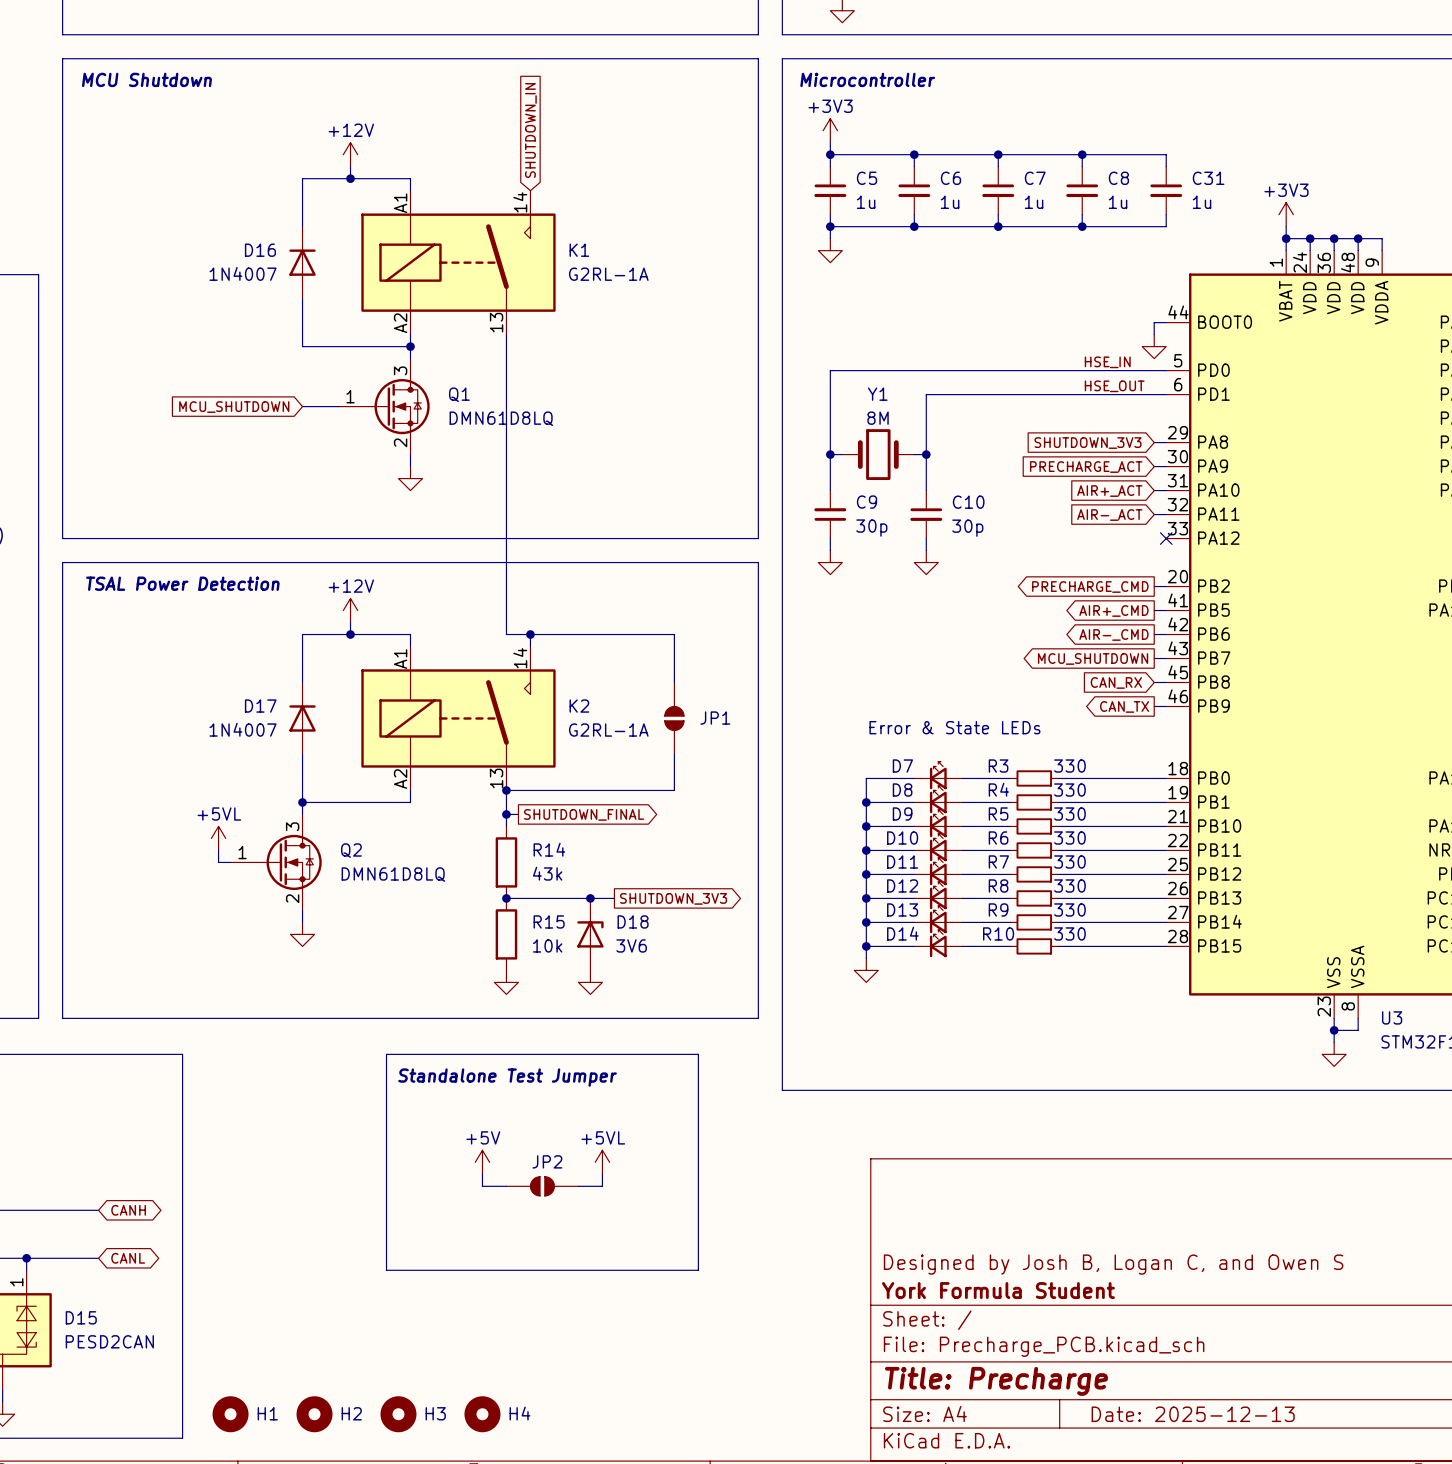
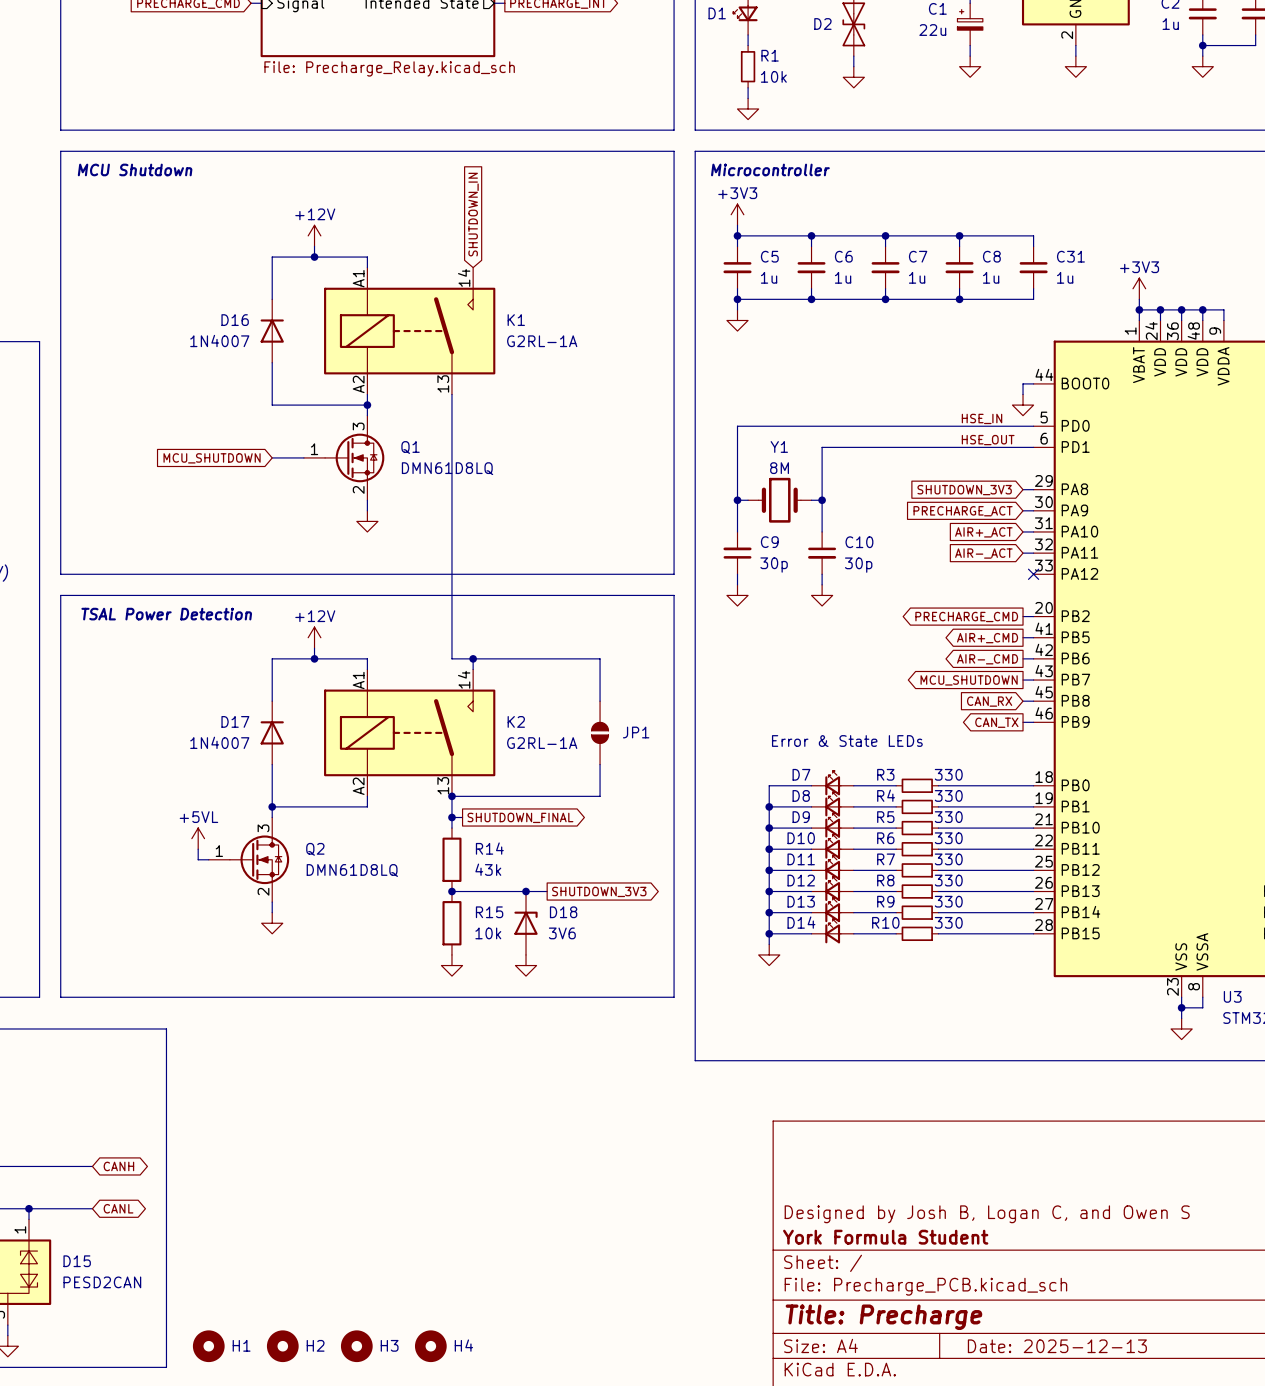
line: (386, 1054) (698, 1054) (698, 1270) (386, 1270) (386, 1054) -> none
text: Standalone Test Jumper (507, 1077) -> none
power symbol: +5V (482, 1162) -> none
power symbol: +5VL (602, 1162) -> none
wire: (482, 1174) (482, 1186) (506, 1186) -> none
wire: (602, 1174) (602, 1186) (578, 1186) -> none
JP2: (542, 1186) -> none

